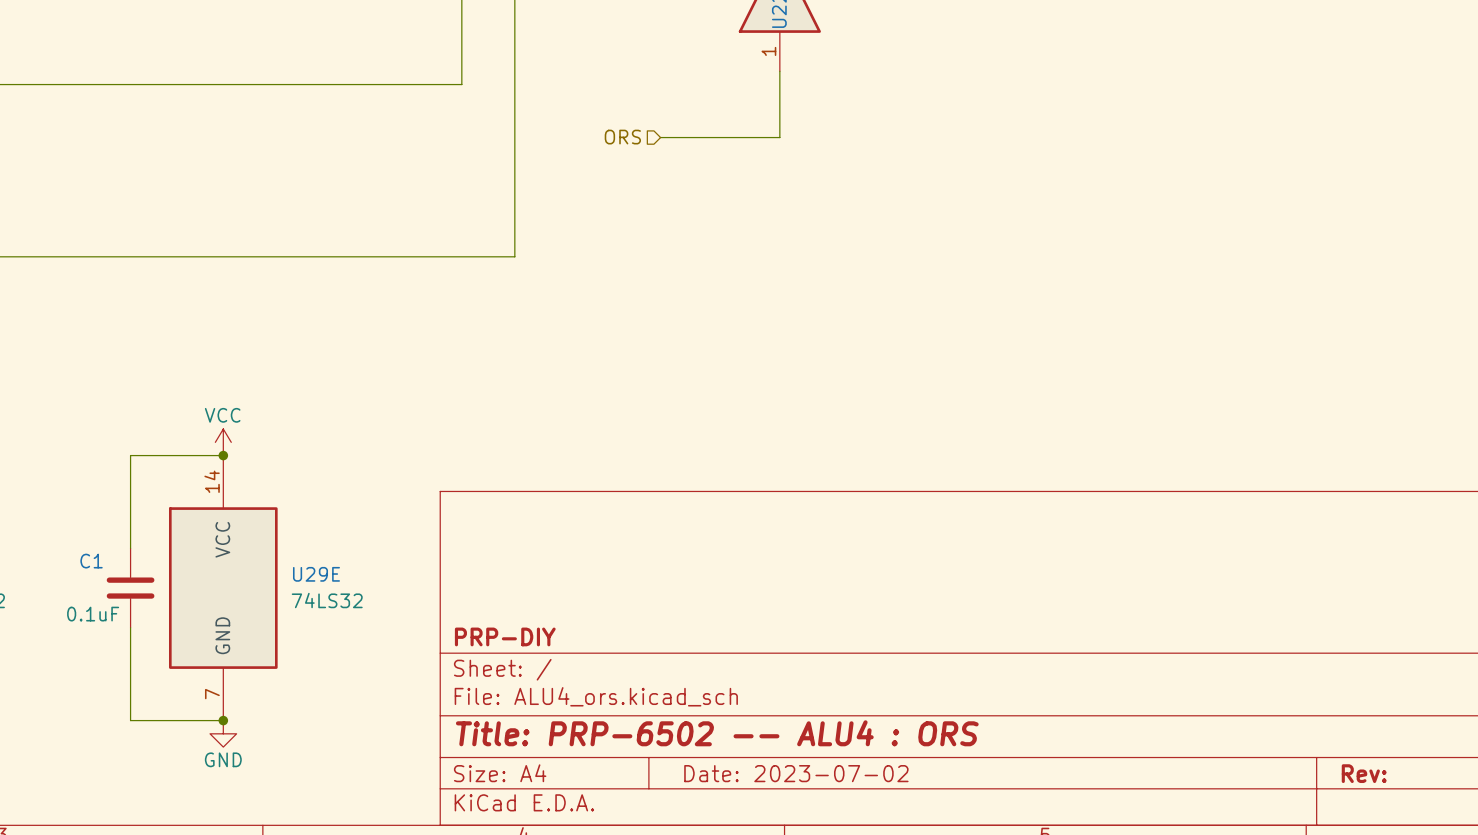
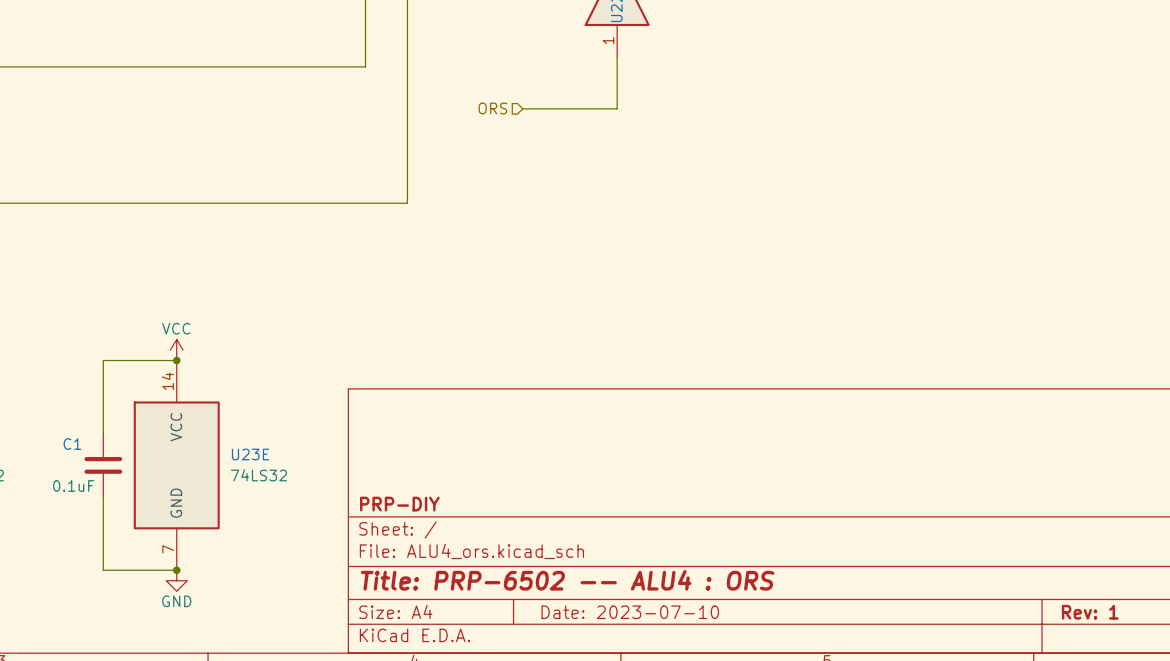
U29E name: U29E (316, 574) -> U23E (250, 454)
title block: Date: 2023-07-02 (796, 773) -> Date: 2023-07-10 (630, 612)
title block: Rev: (1364, 773) -> Rev: 1 (1090, 612)

